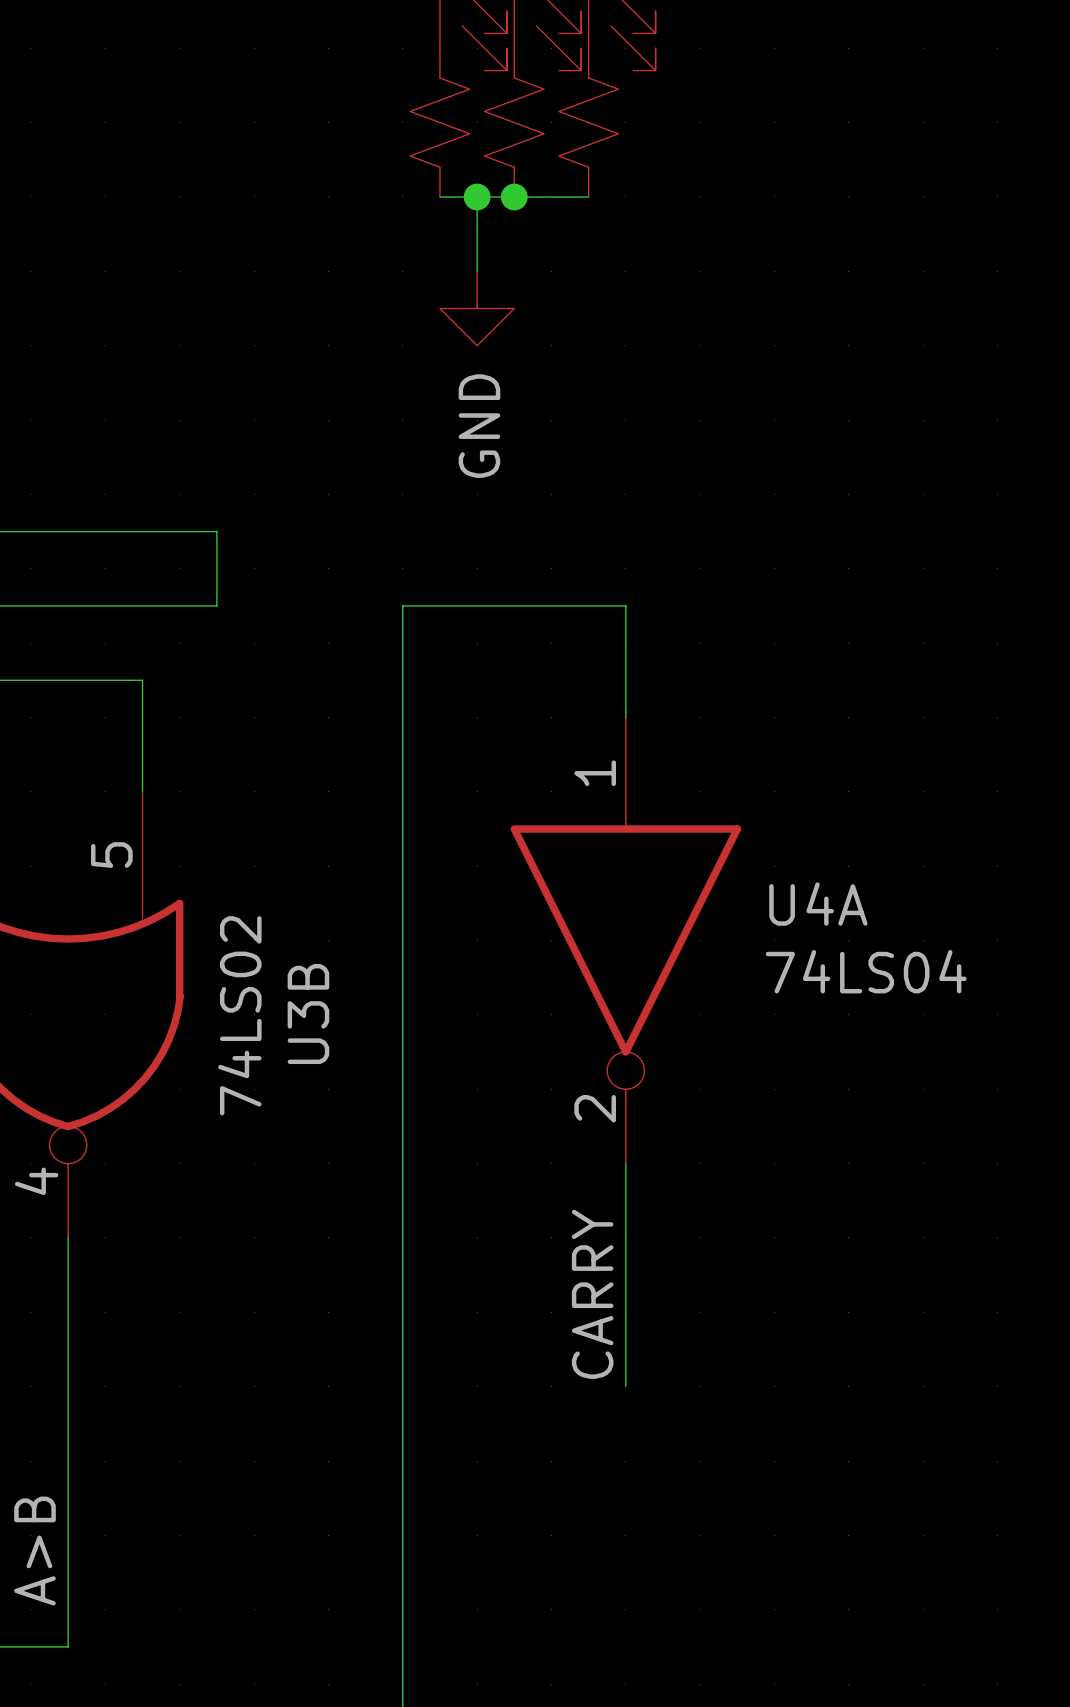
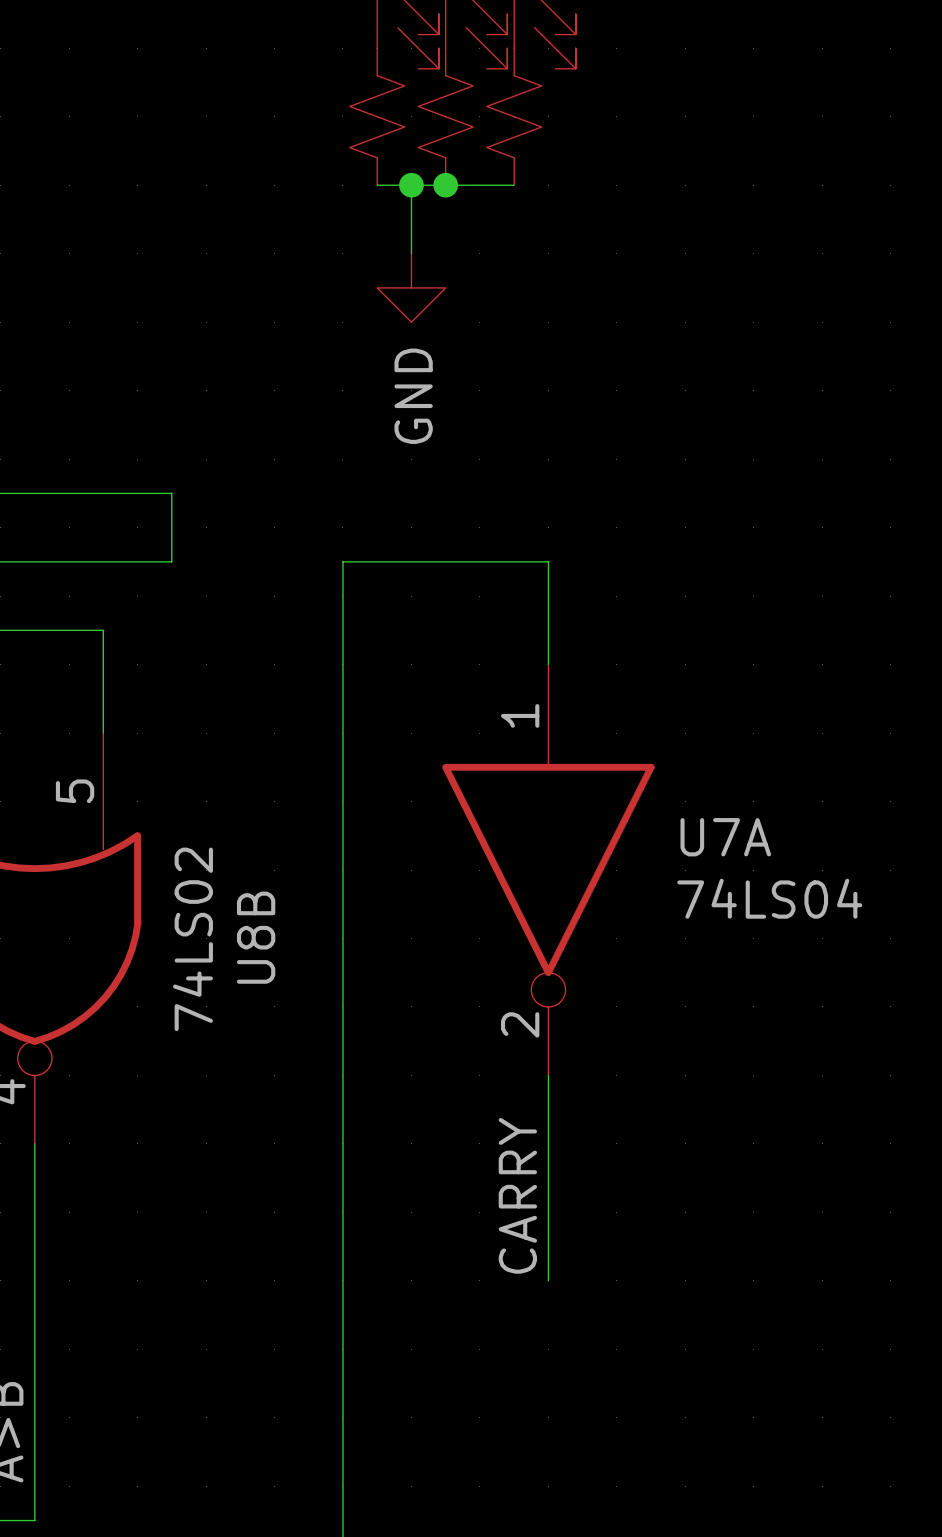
U4A name: U4A (818, 904) -> U7A (725, 837)
U3B name: U3B (308, 1014) -> U8B (256, 937)

